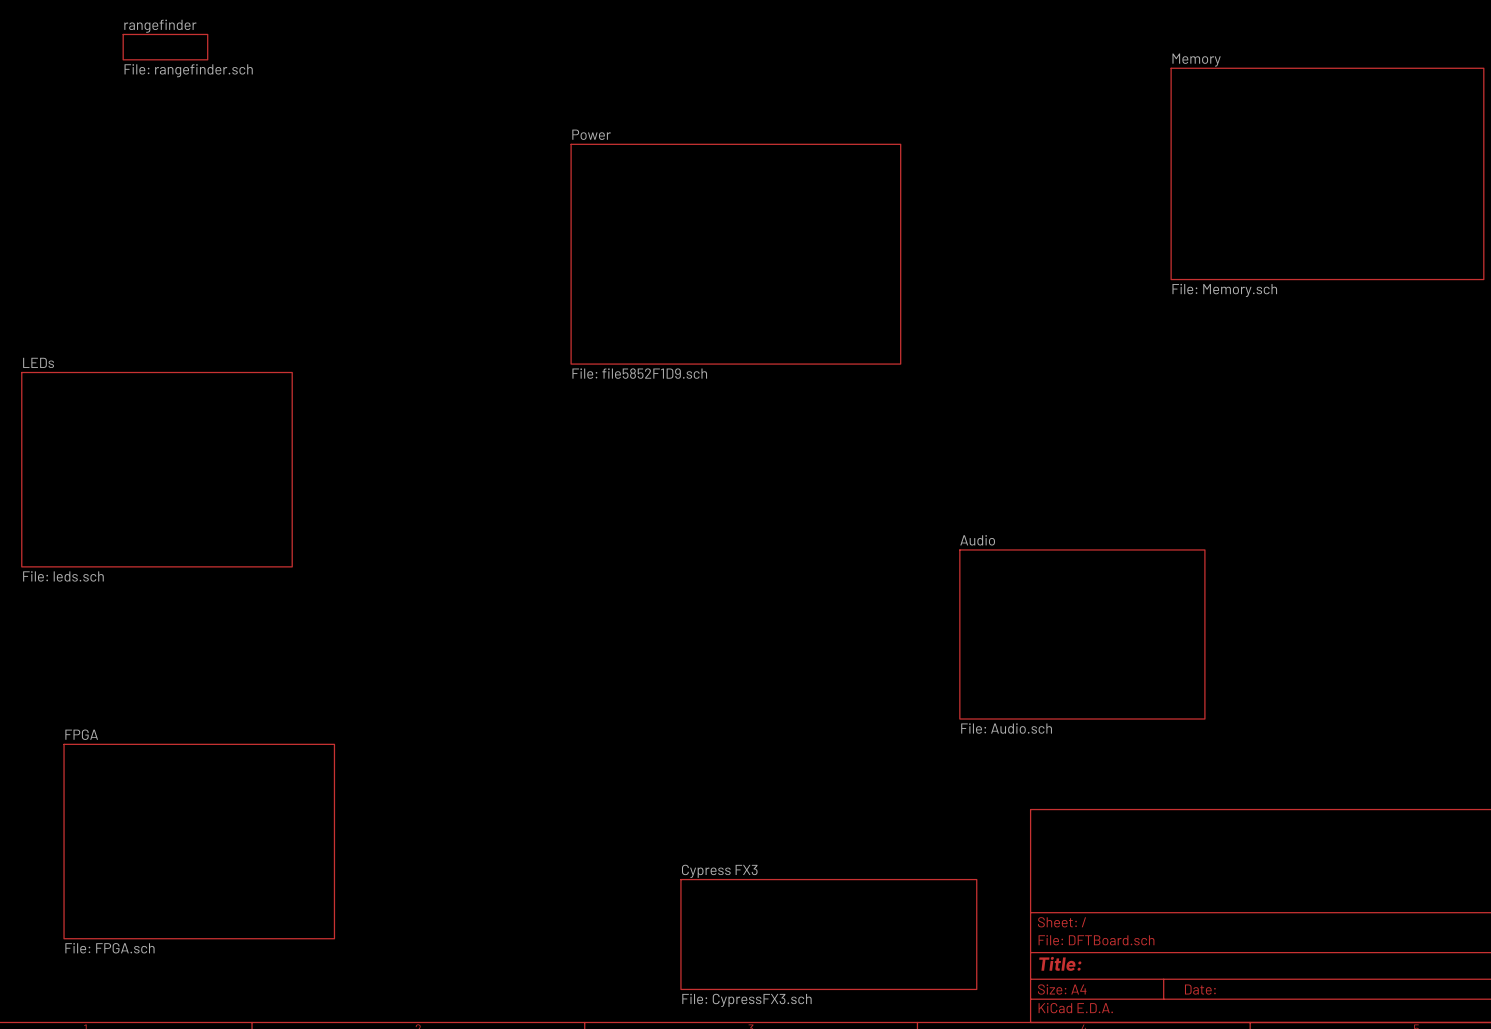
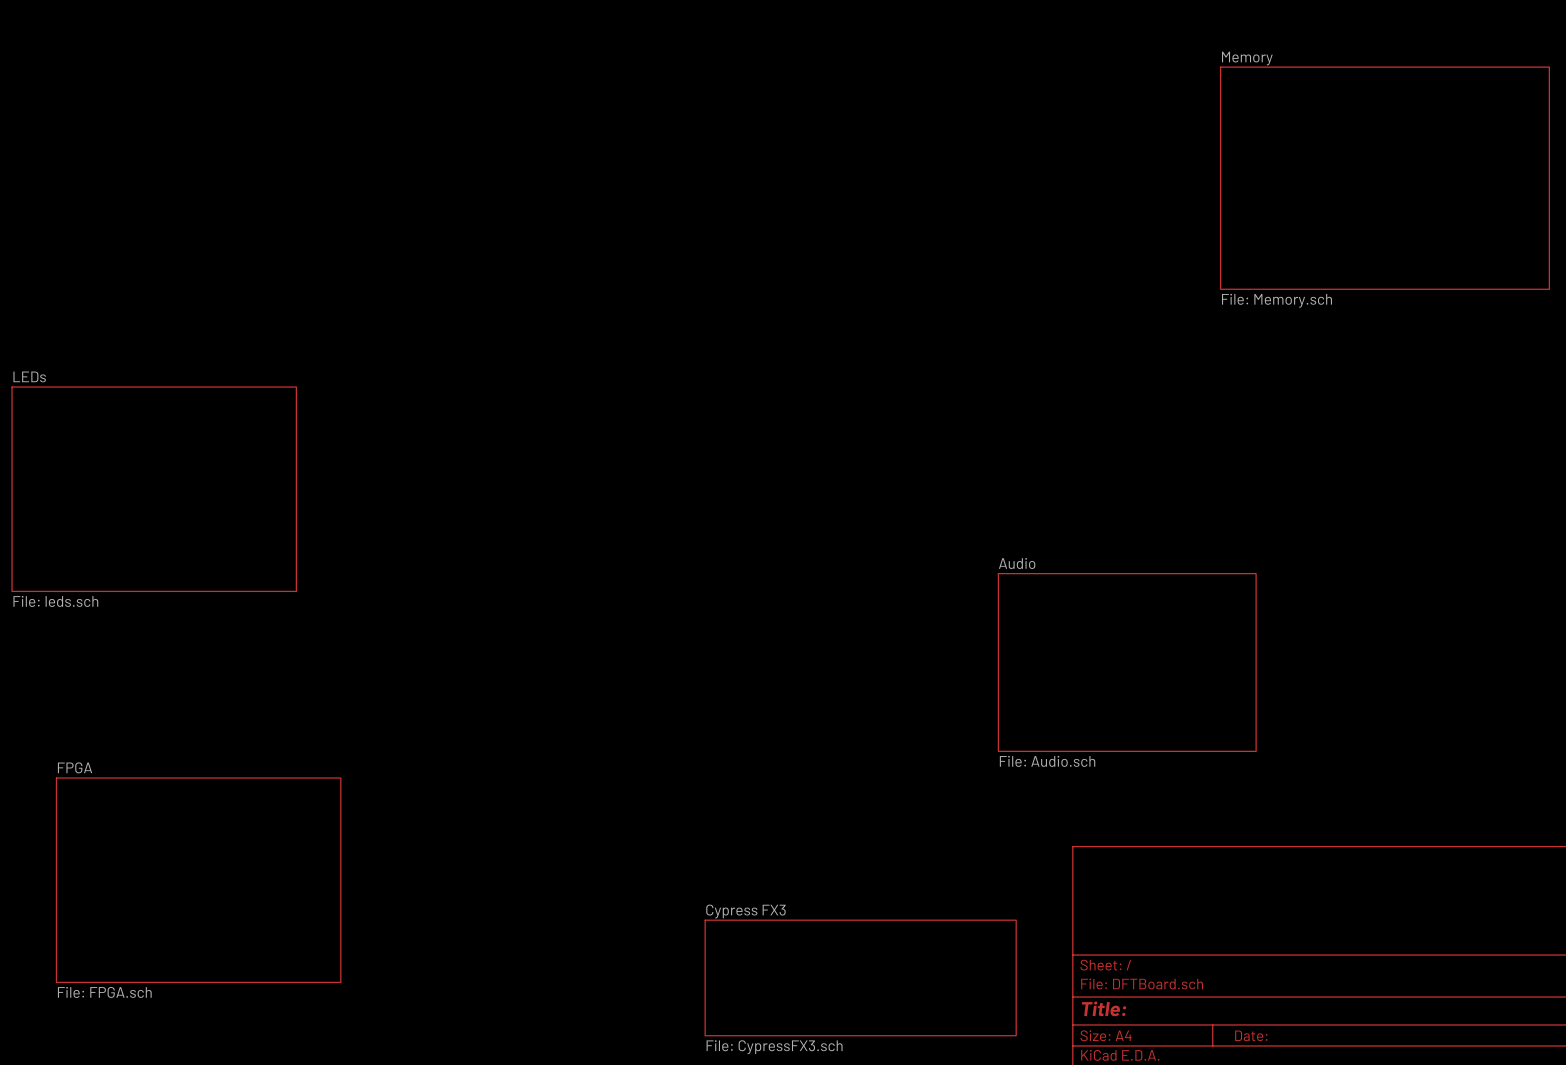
sheet rangefinder: File: rangefinder.sch (165, 47) -> none
sheet Power: File: file5852F1D9.sch (735, 254) -> none

